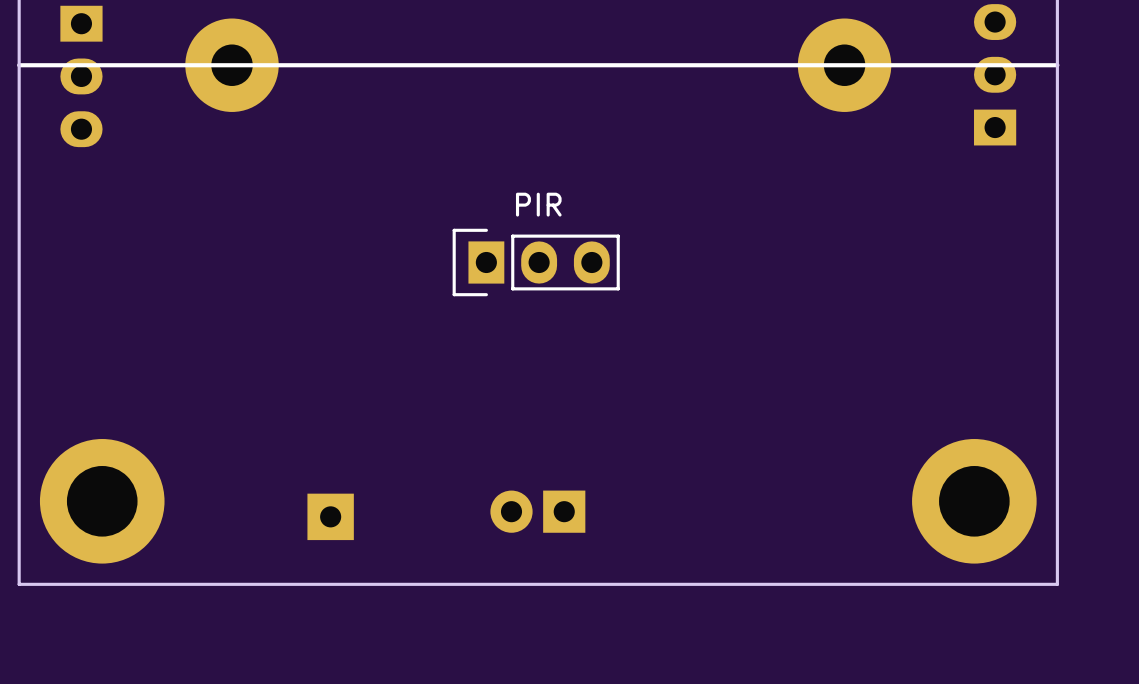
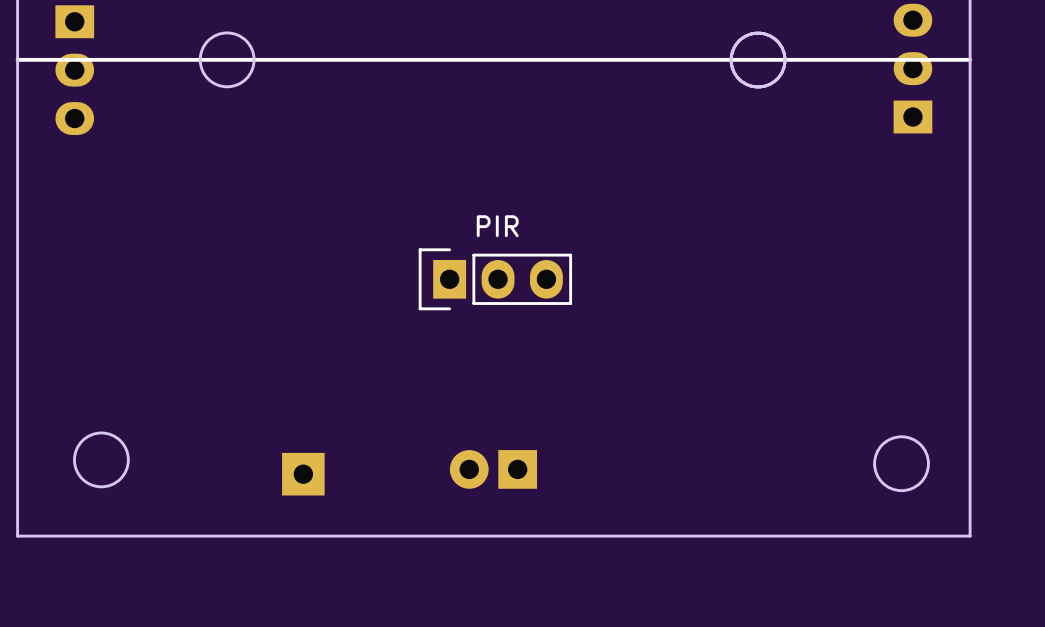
round board edge: none -> [198, 31, 256, 89]
round board edge: none -> [729, 31, 787, 89]
part: (232, 65) -> none
part: (844, 65) -> none
part position: (536, 262) -> (495, 279)
round board edge: none -> [73, 431, 130, 489]
round board edge: none -> [873, 435, 930, 493]
part: (102, 501) -> none
part: (974, 501) -> none

